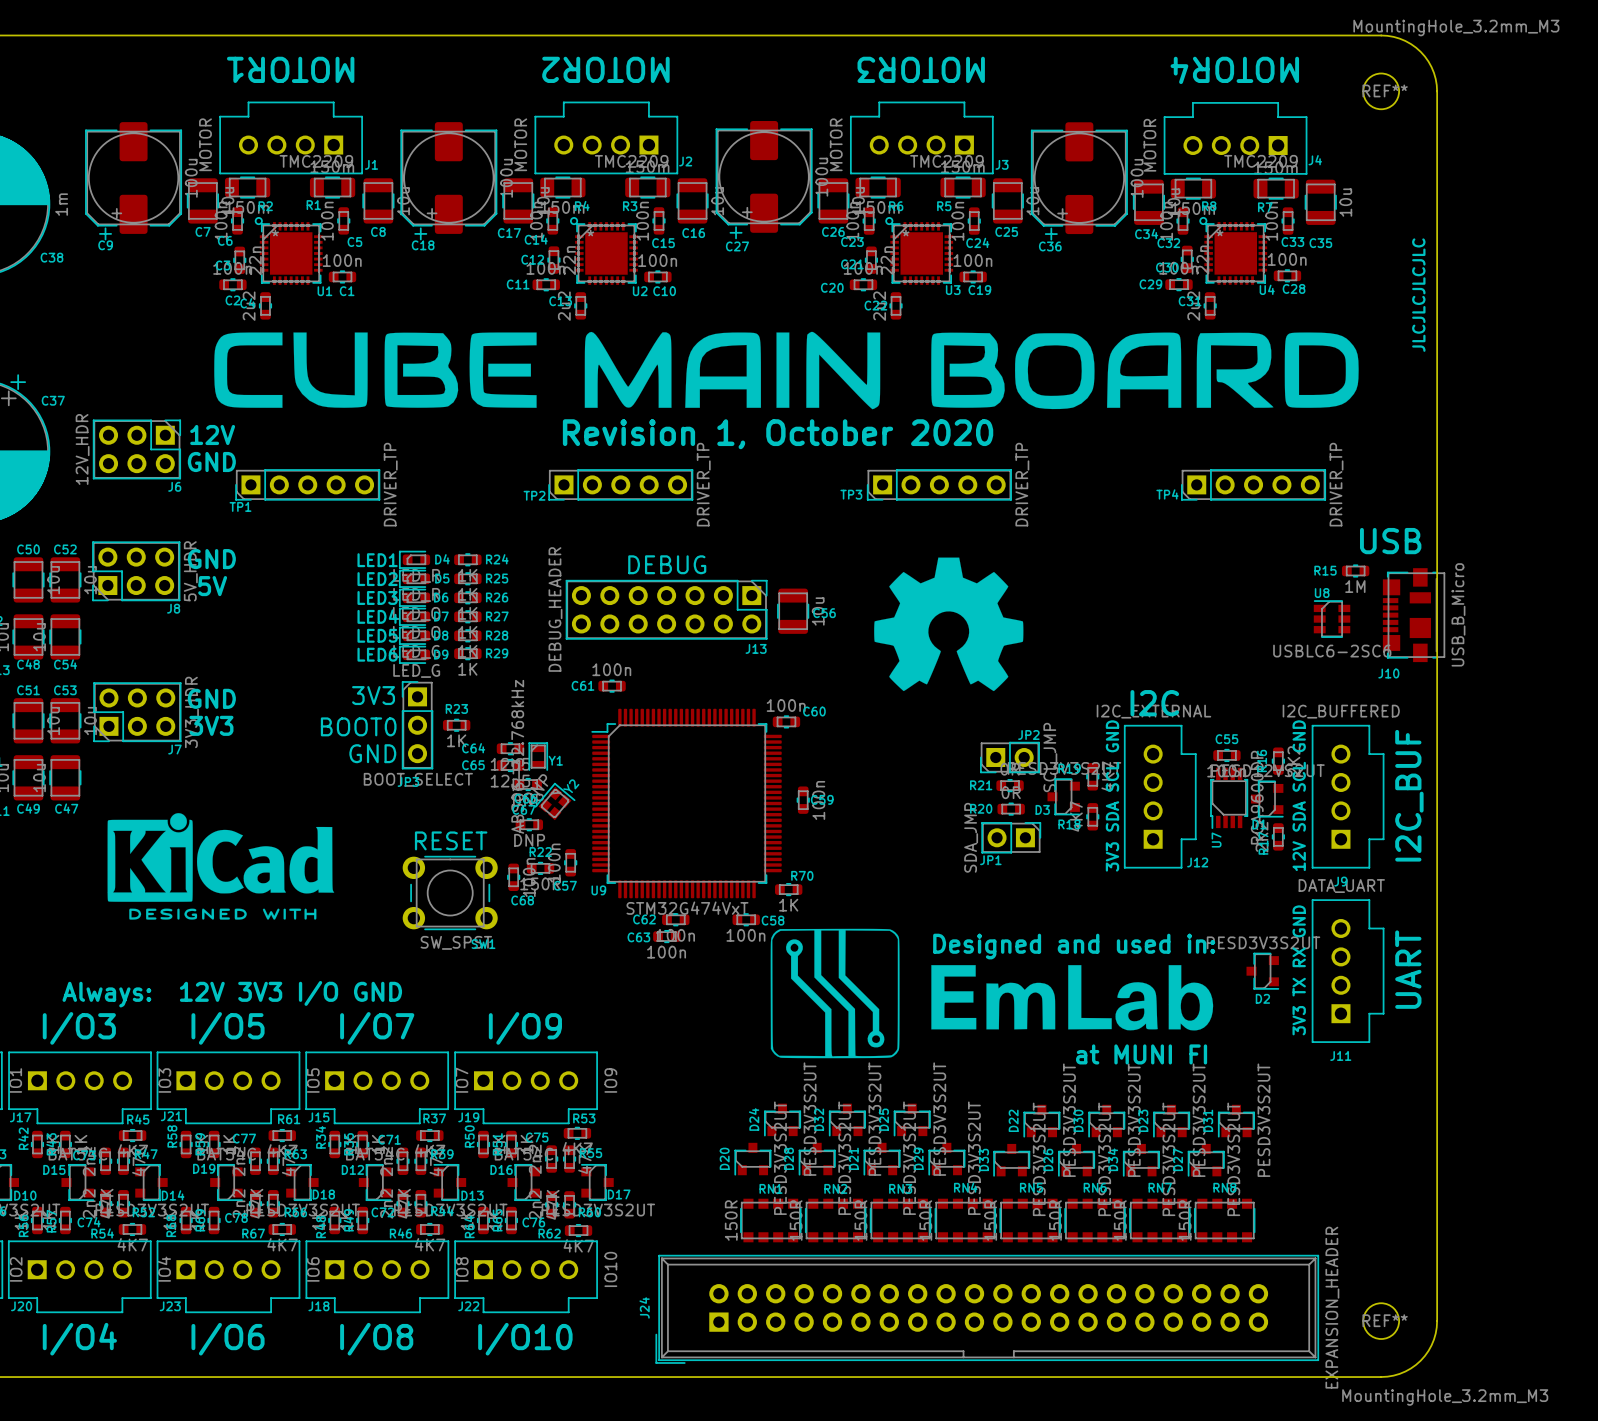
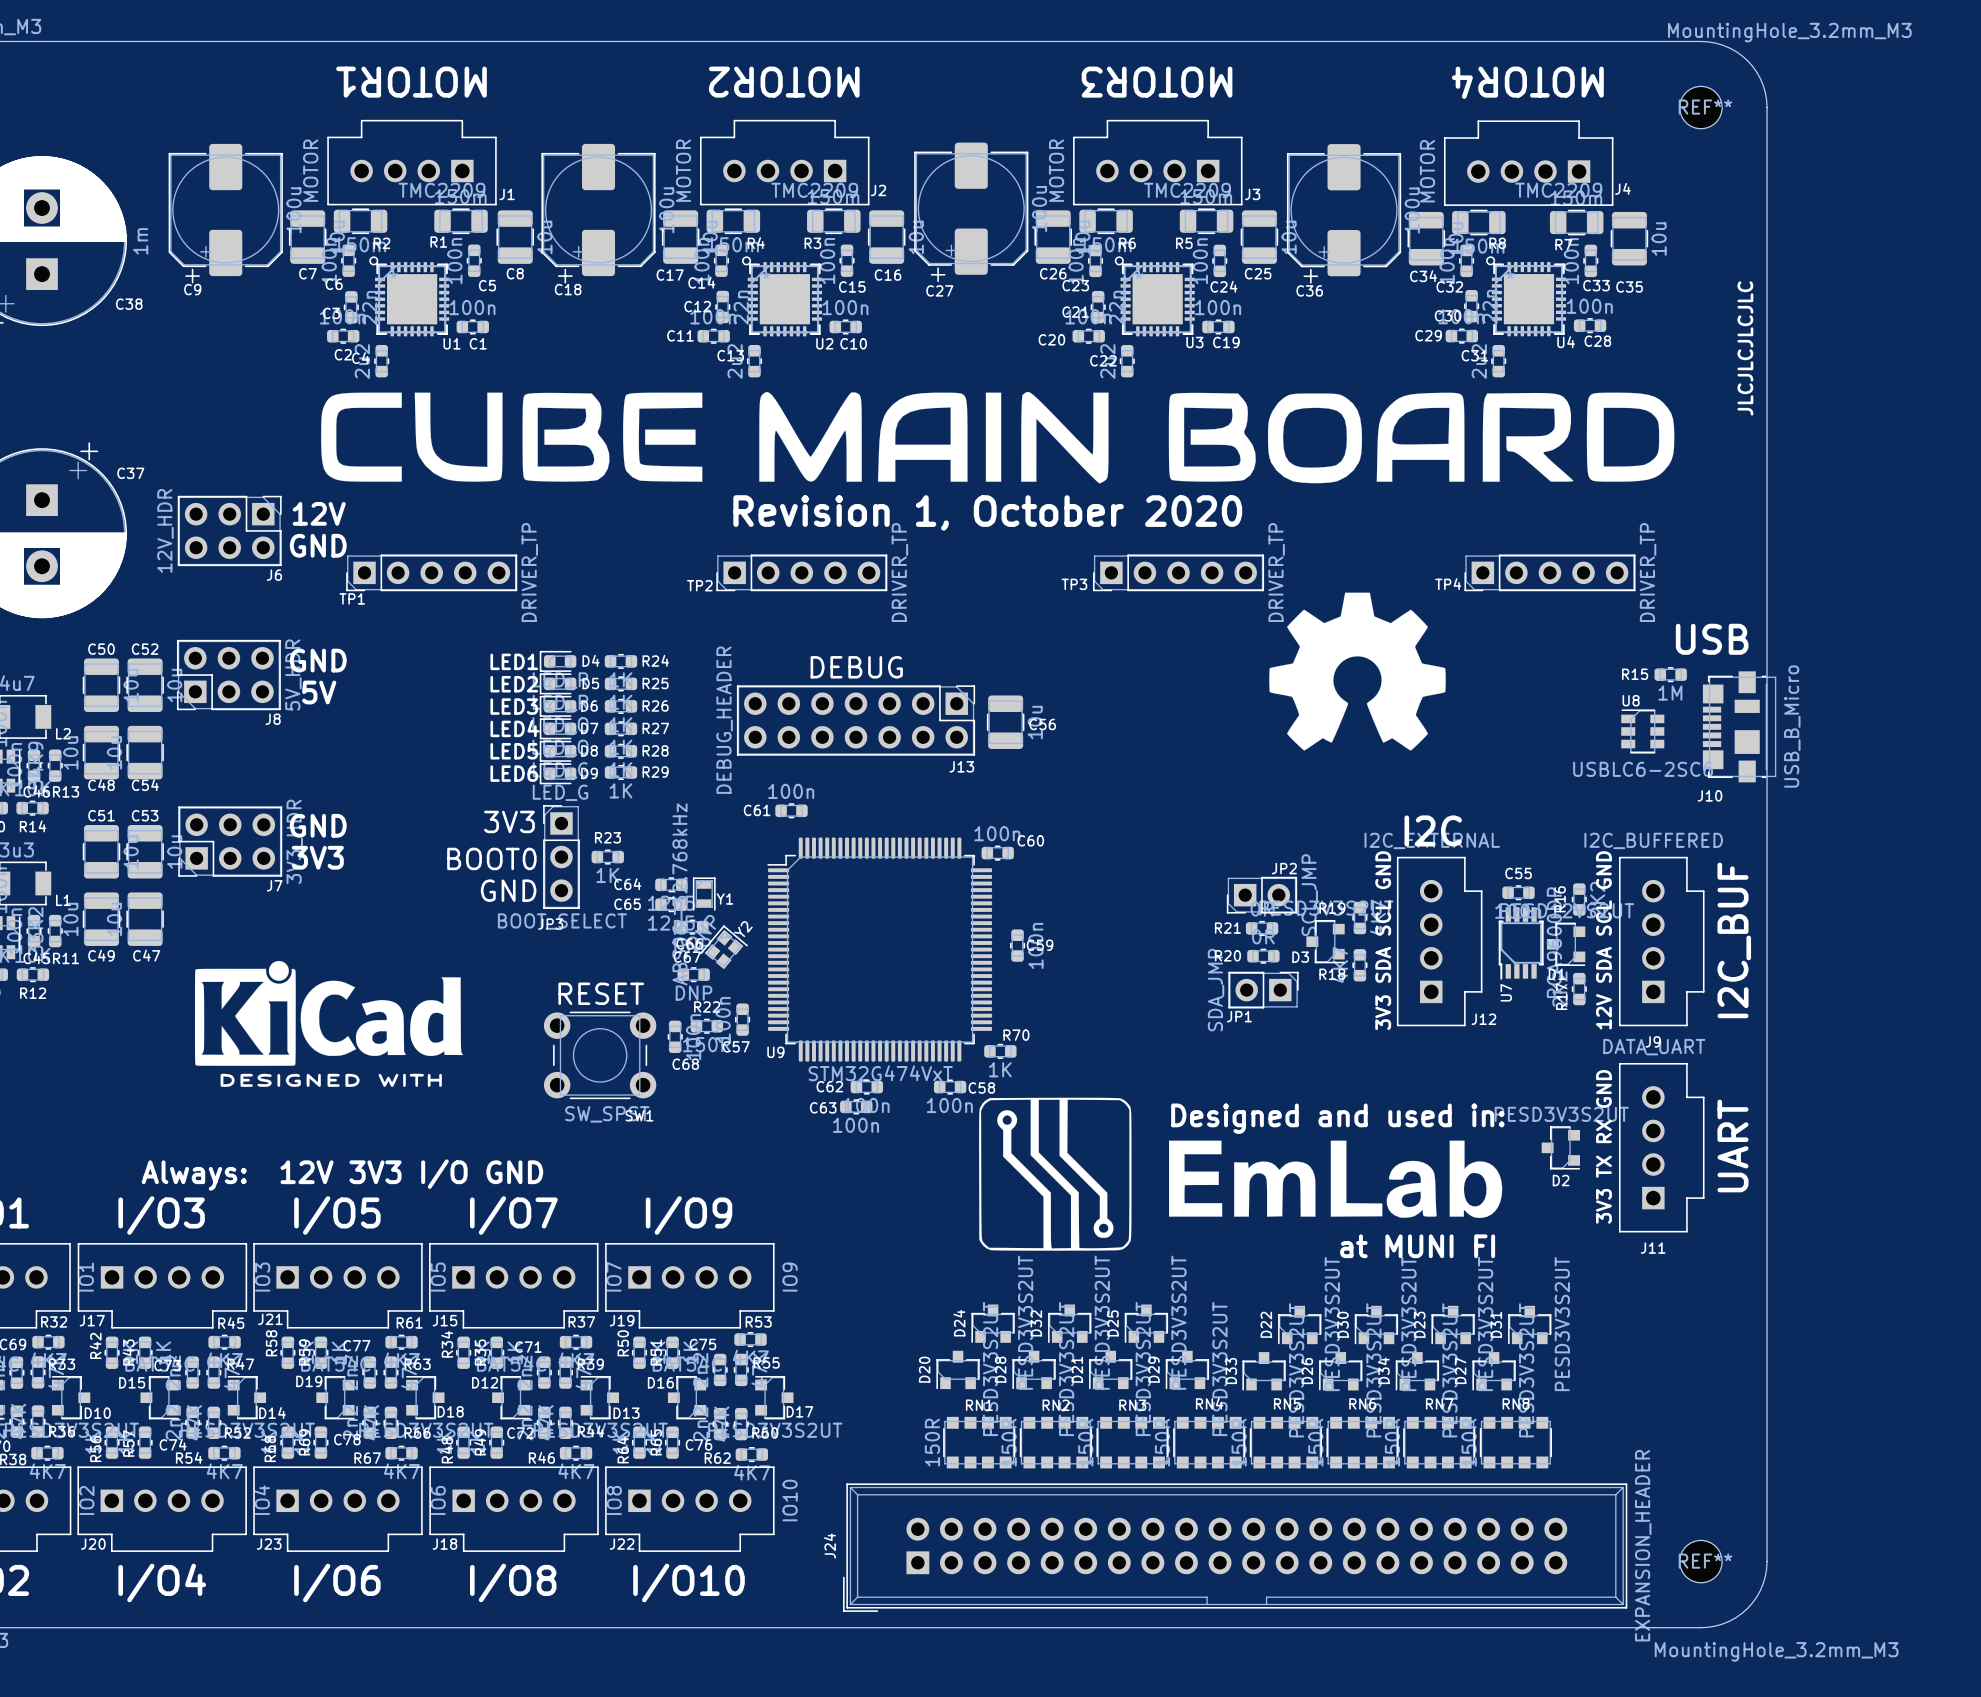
drawing position: (948, 624) -> (1357, 671)

